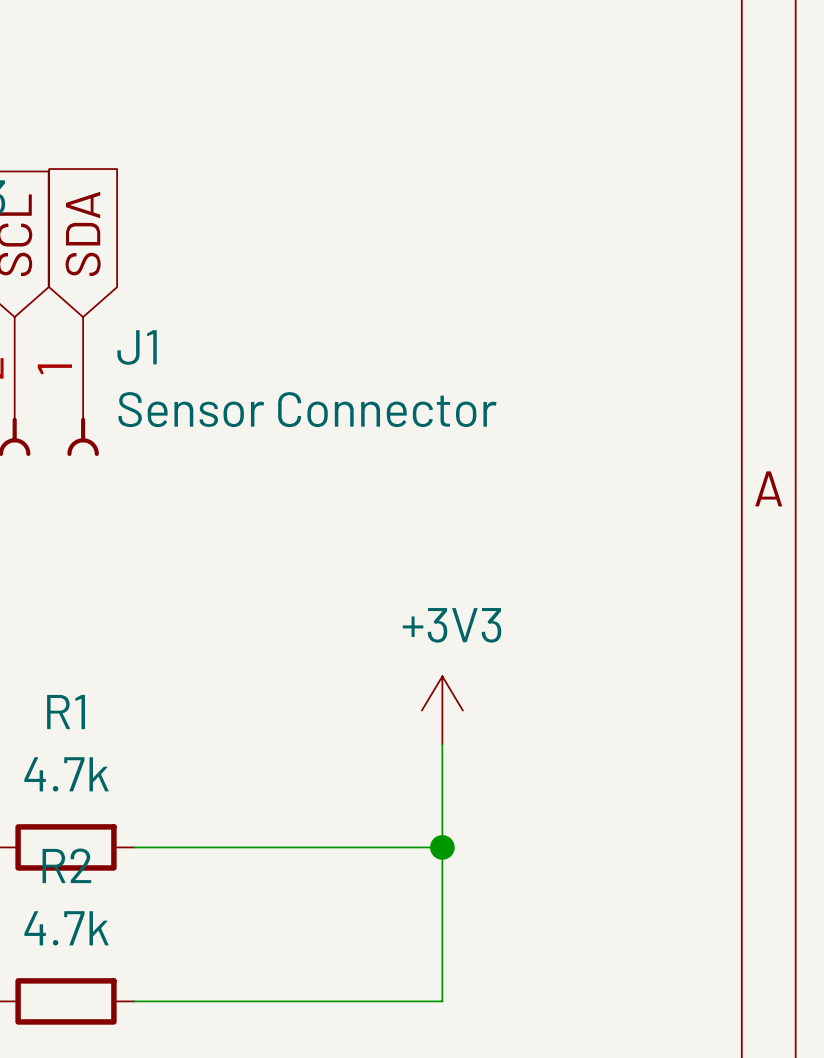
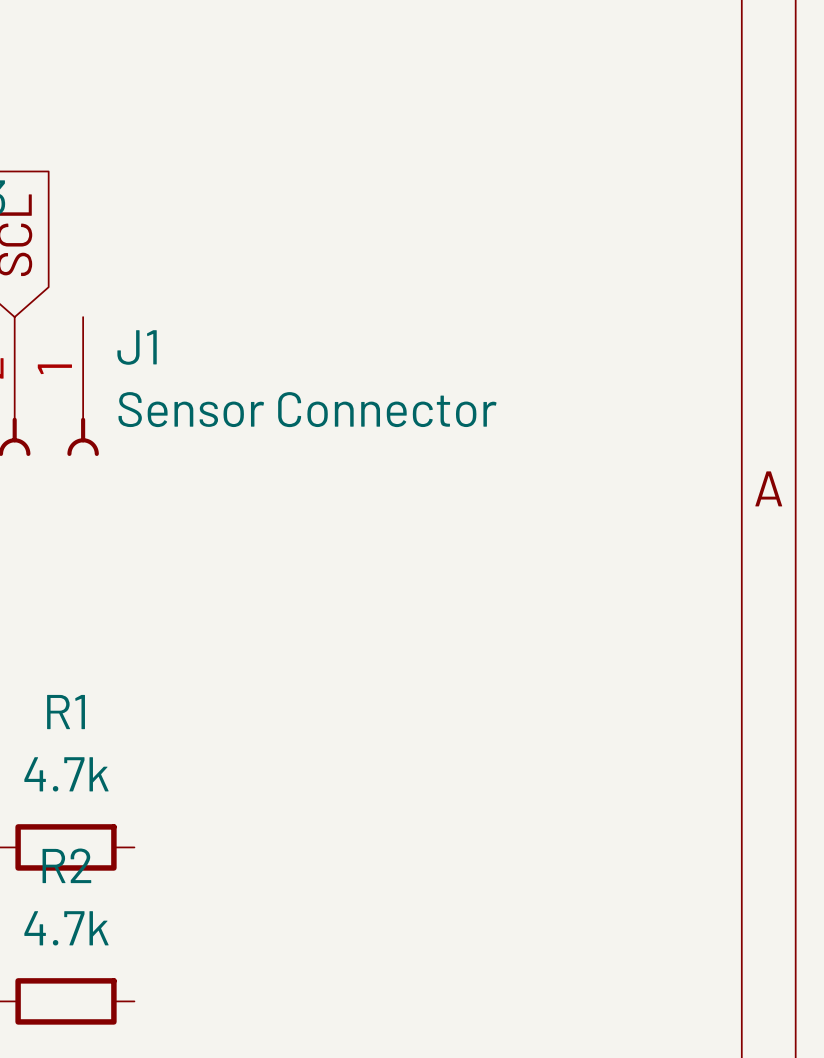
global label: SDA (83, 233) -> none
power symbol: +3V3 (442, 710) -> none
wire: (442, 744) (442, 1001) (134, 1001) -> none
wire: (134, 847) (442, 847) -> none
junction: (442, 847) -> none

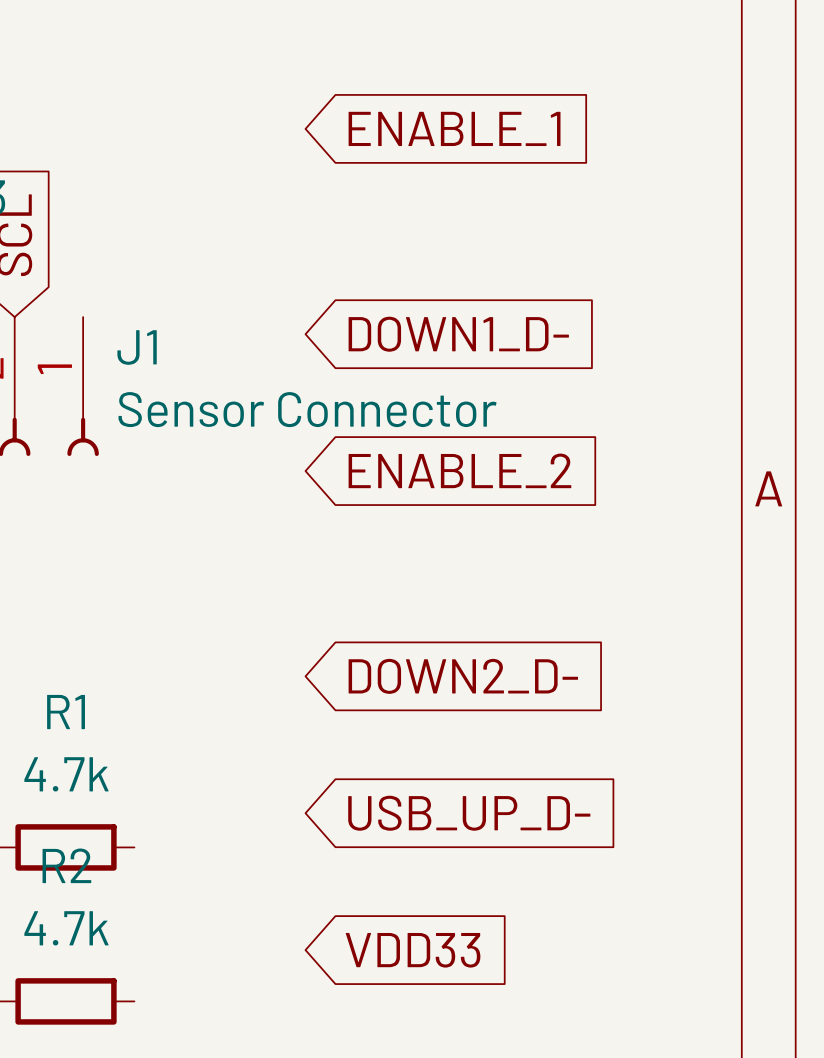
global label: none -> ENABLE_1 (454, 128)
global label: none -> DOWN1_D- (458, 334)
global label: none -> ENABLE_2 (459, 470)
global label: none -> DOWN2_D- (463, 676)
global label: none -> USB_UP_D- (469, 813)
global label: none -> VDD33 (413, 950)

